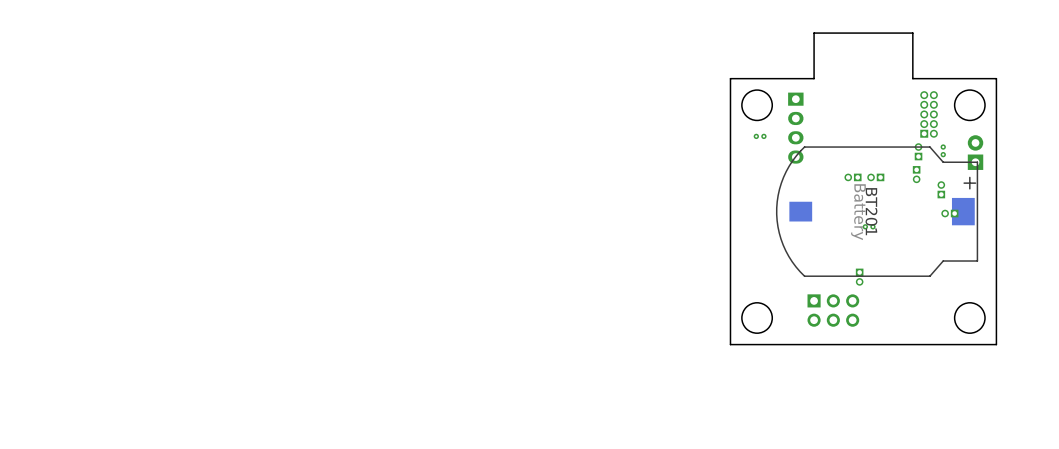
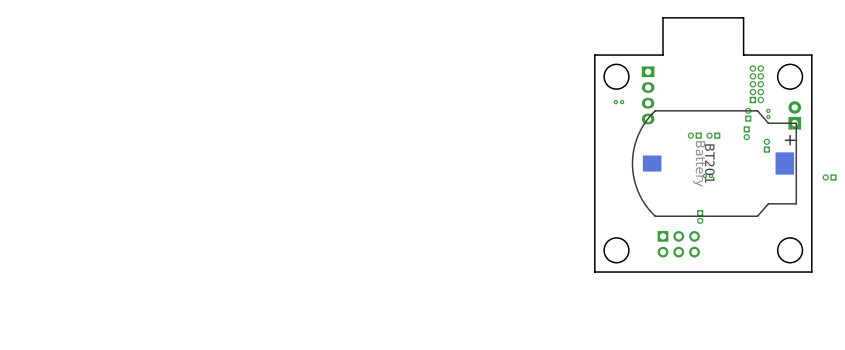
part position: (949, 213) -> (829, 177)

